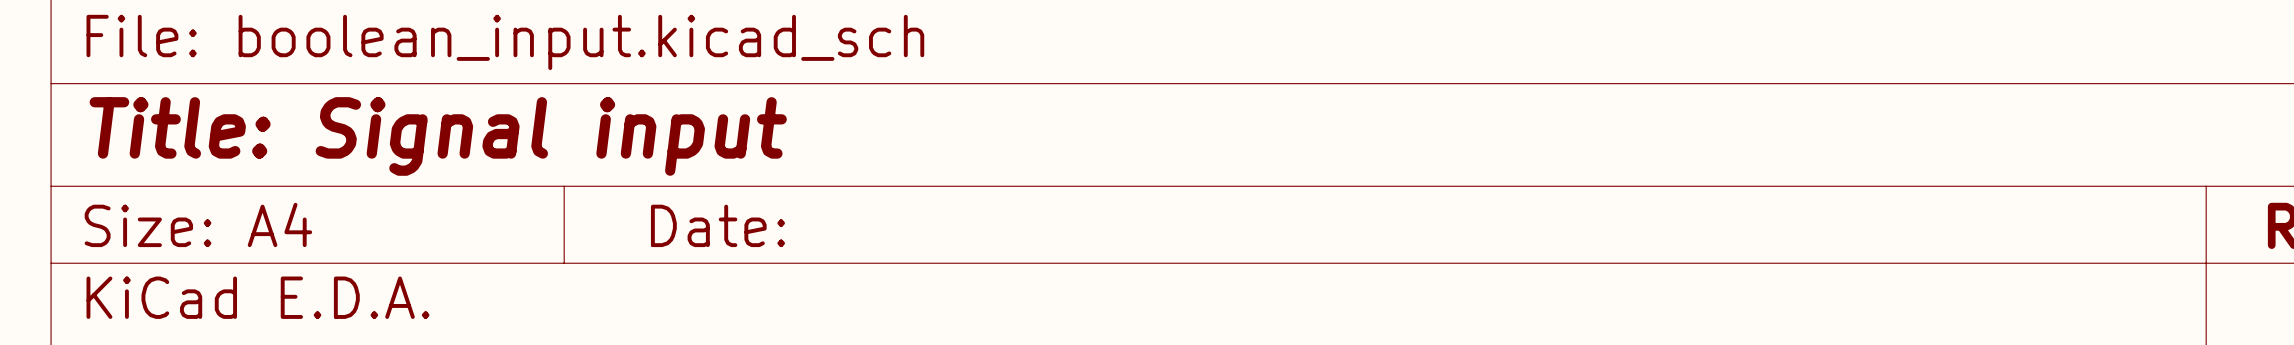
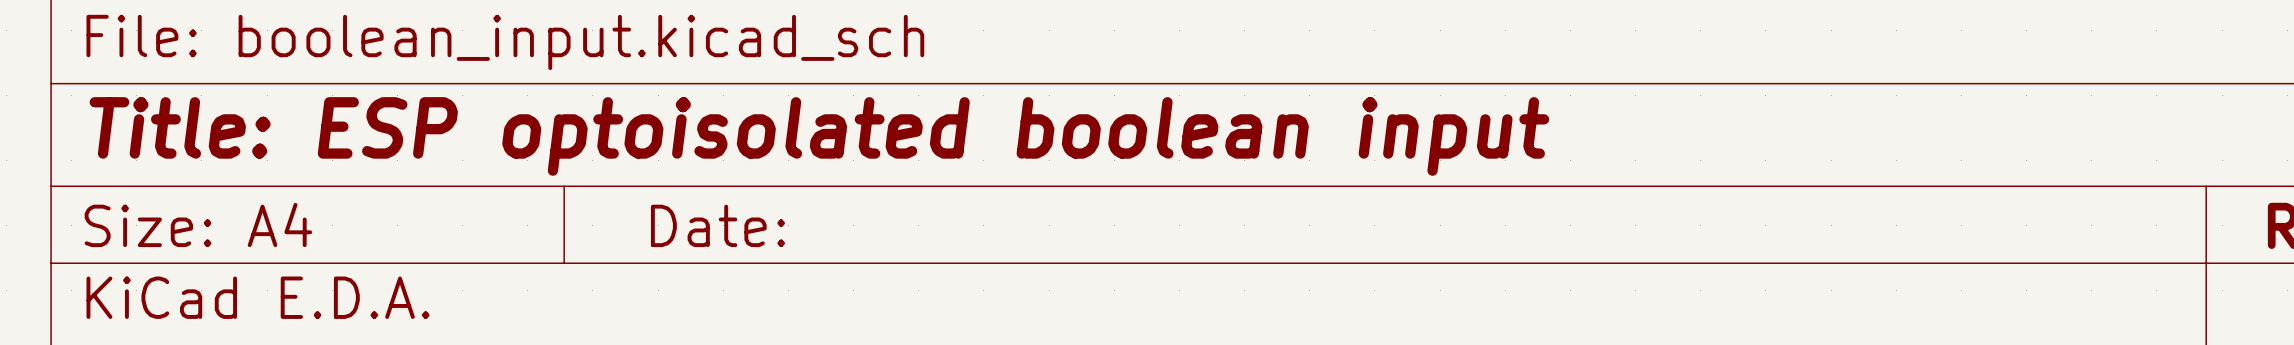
title block: Title: Signal input (438, 136) -> Title: ESP optoisolated boolean input (819, 136)

